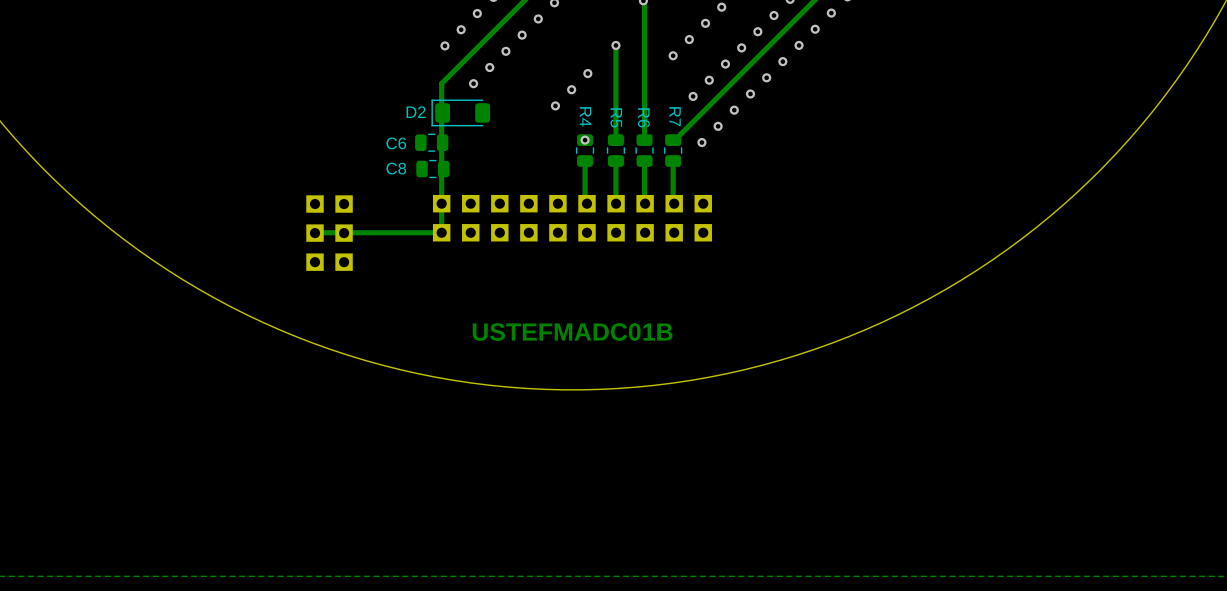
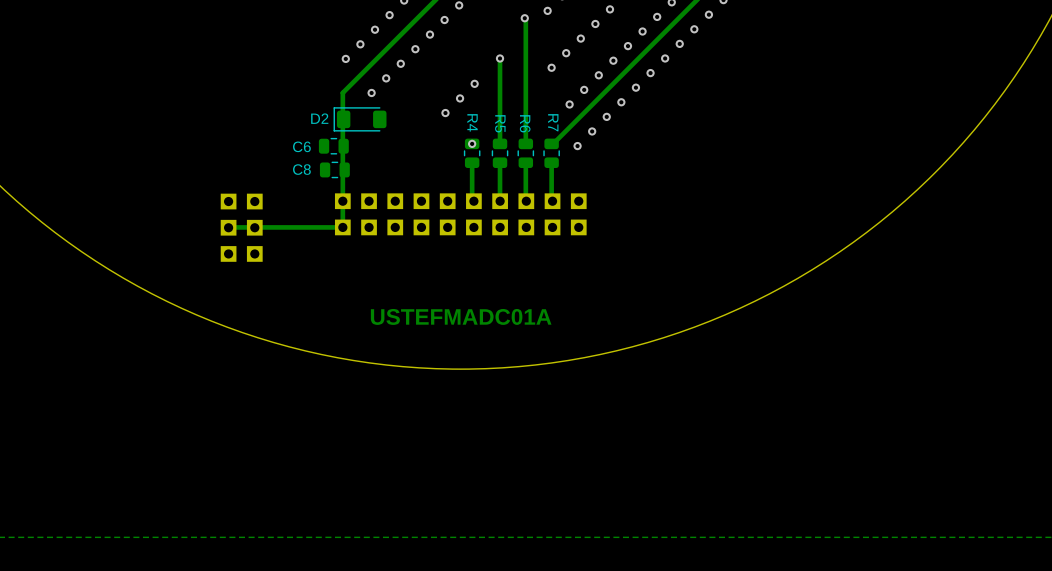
text: USTEFMADC01B (572, 332) -> USTEFMADC01A (461, 316)

